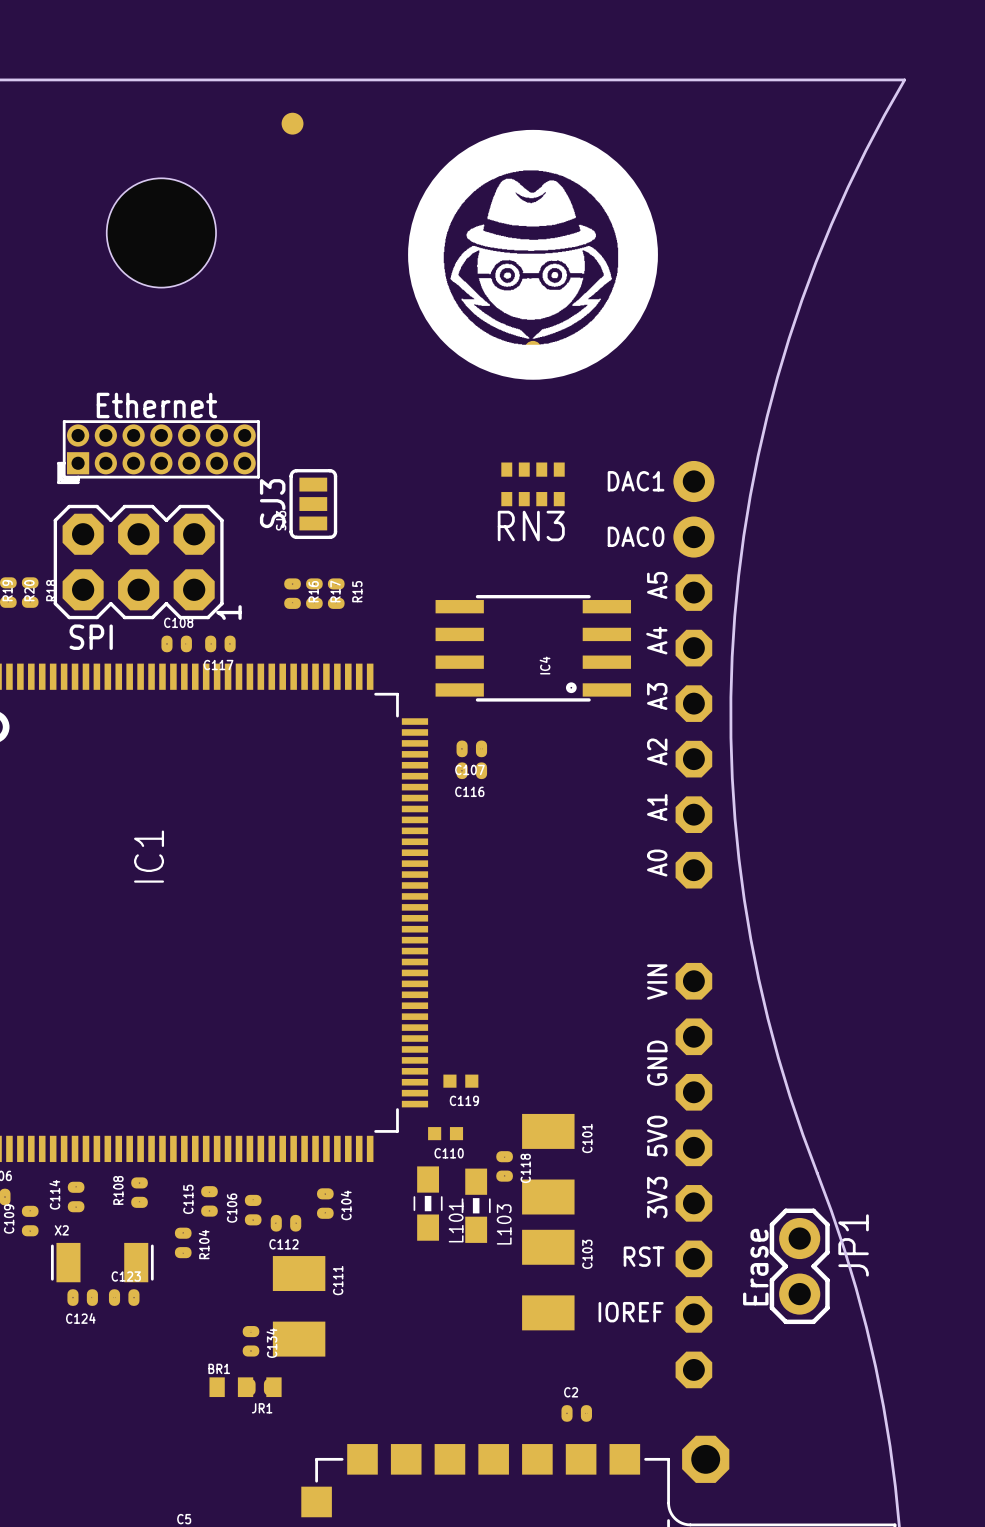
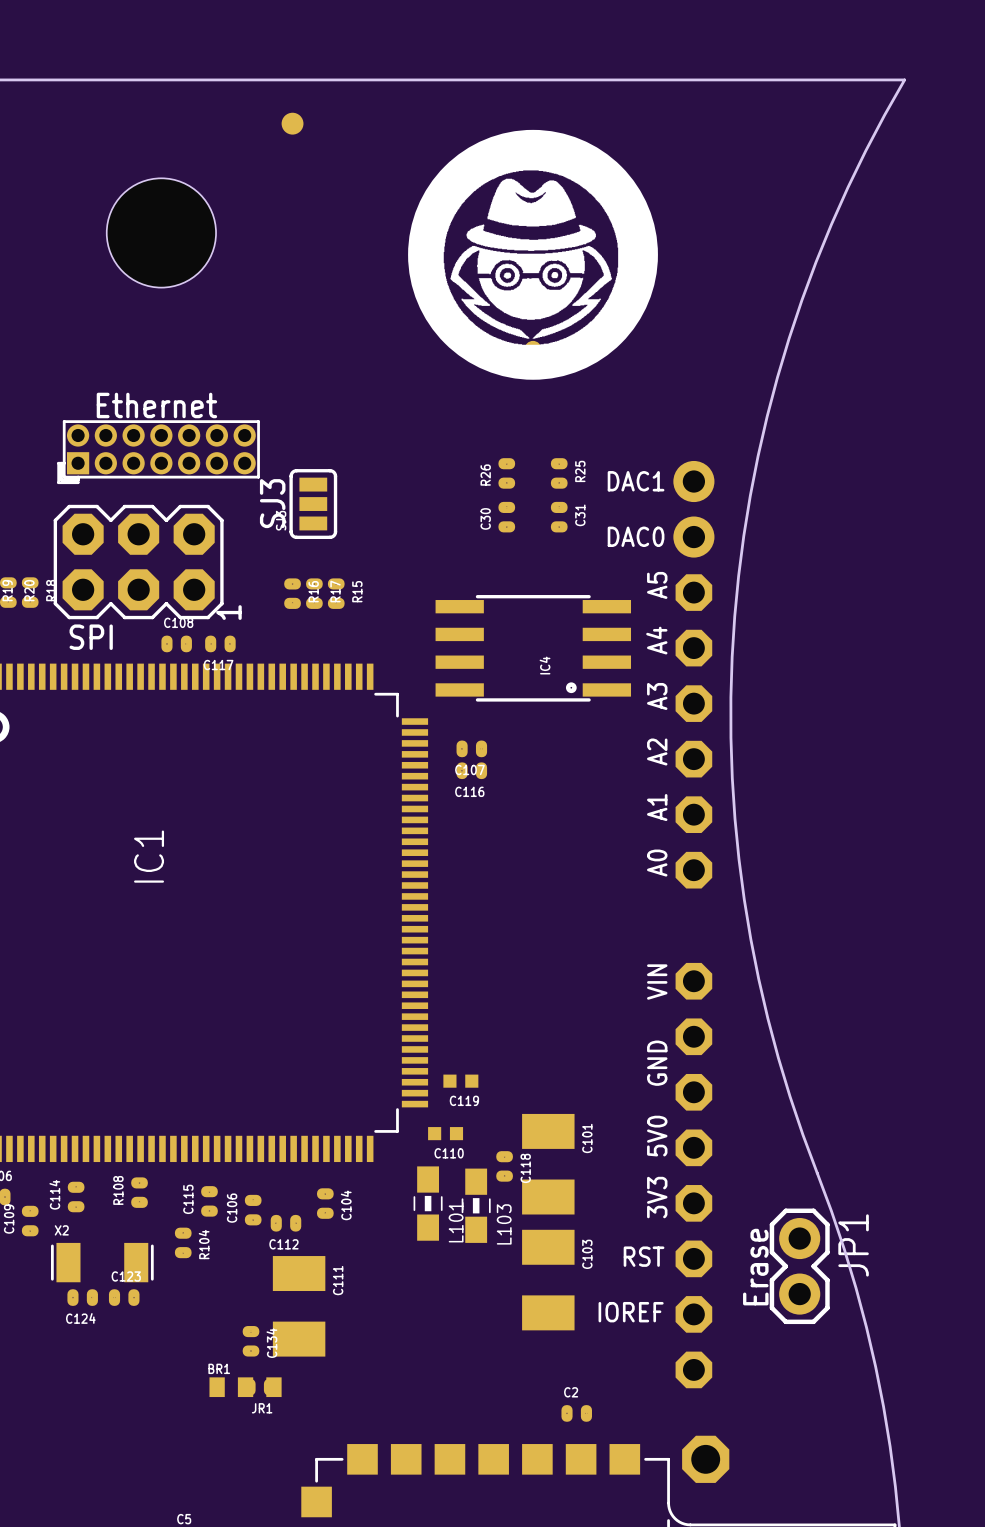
R26: none -> (506, 473)
R25: none -> (559, 473)
RN3: (533, 484) -> none
C30: none -> (506, 517)
C31: none -> (559, 517)

